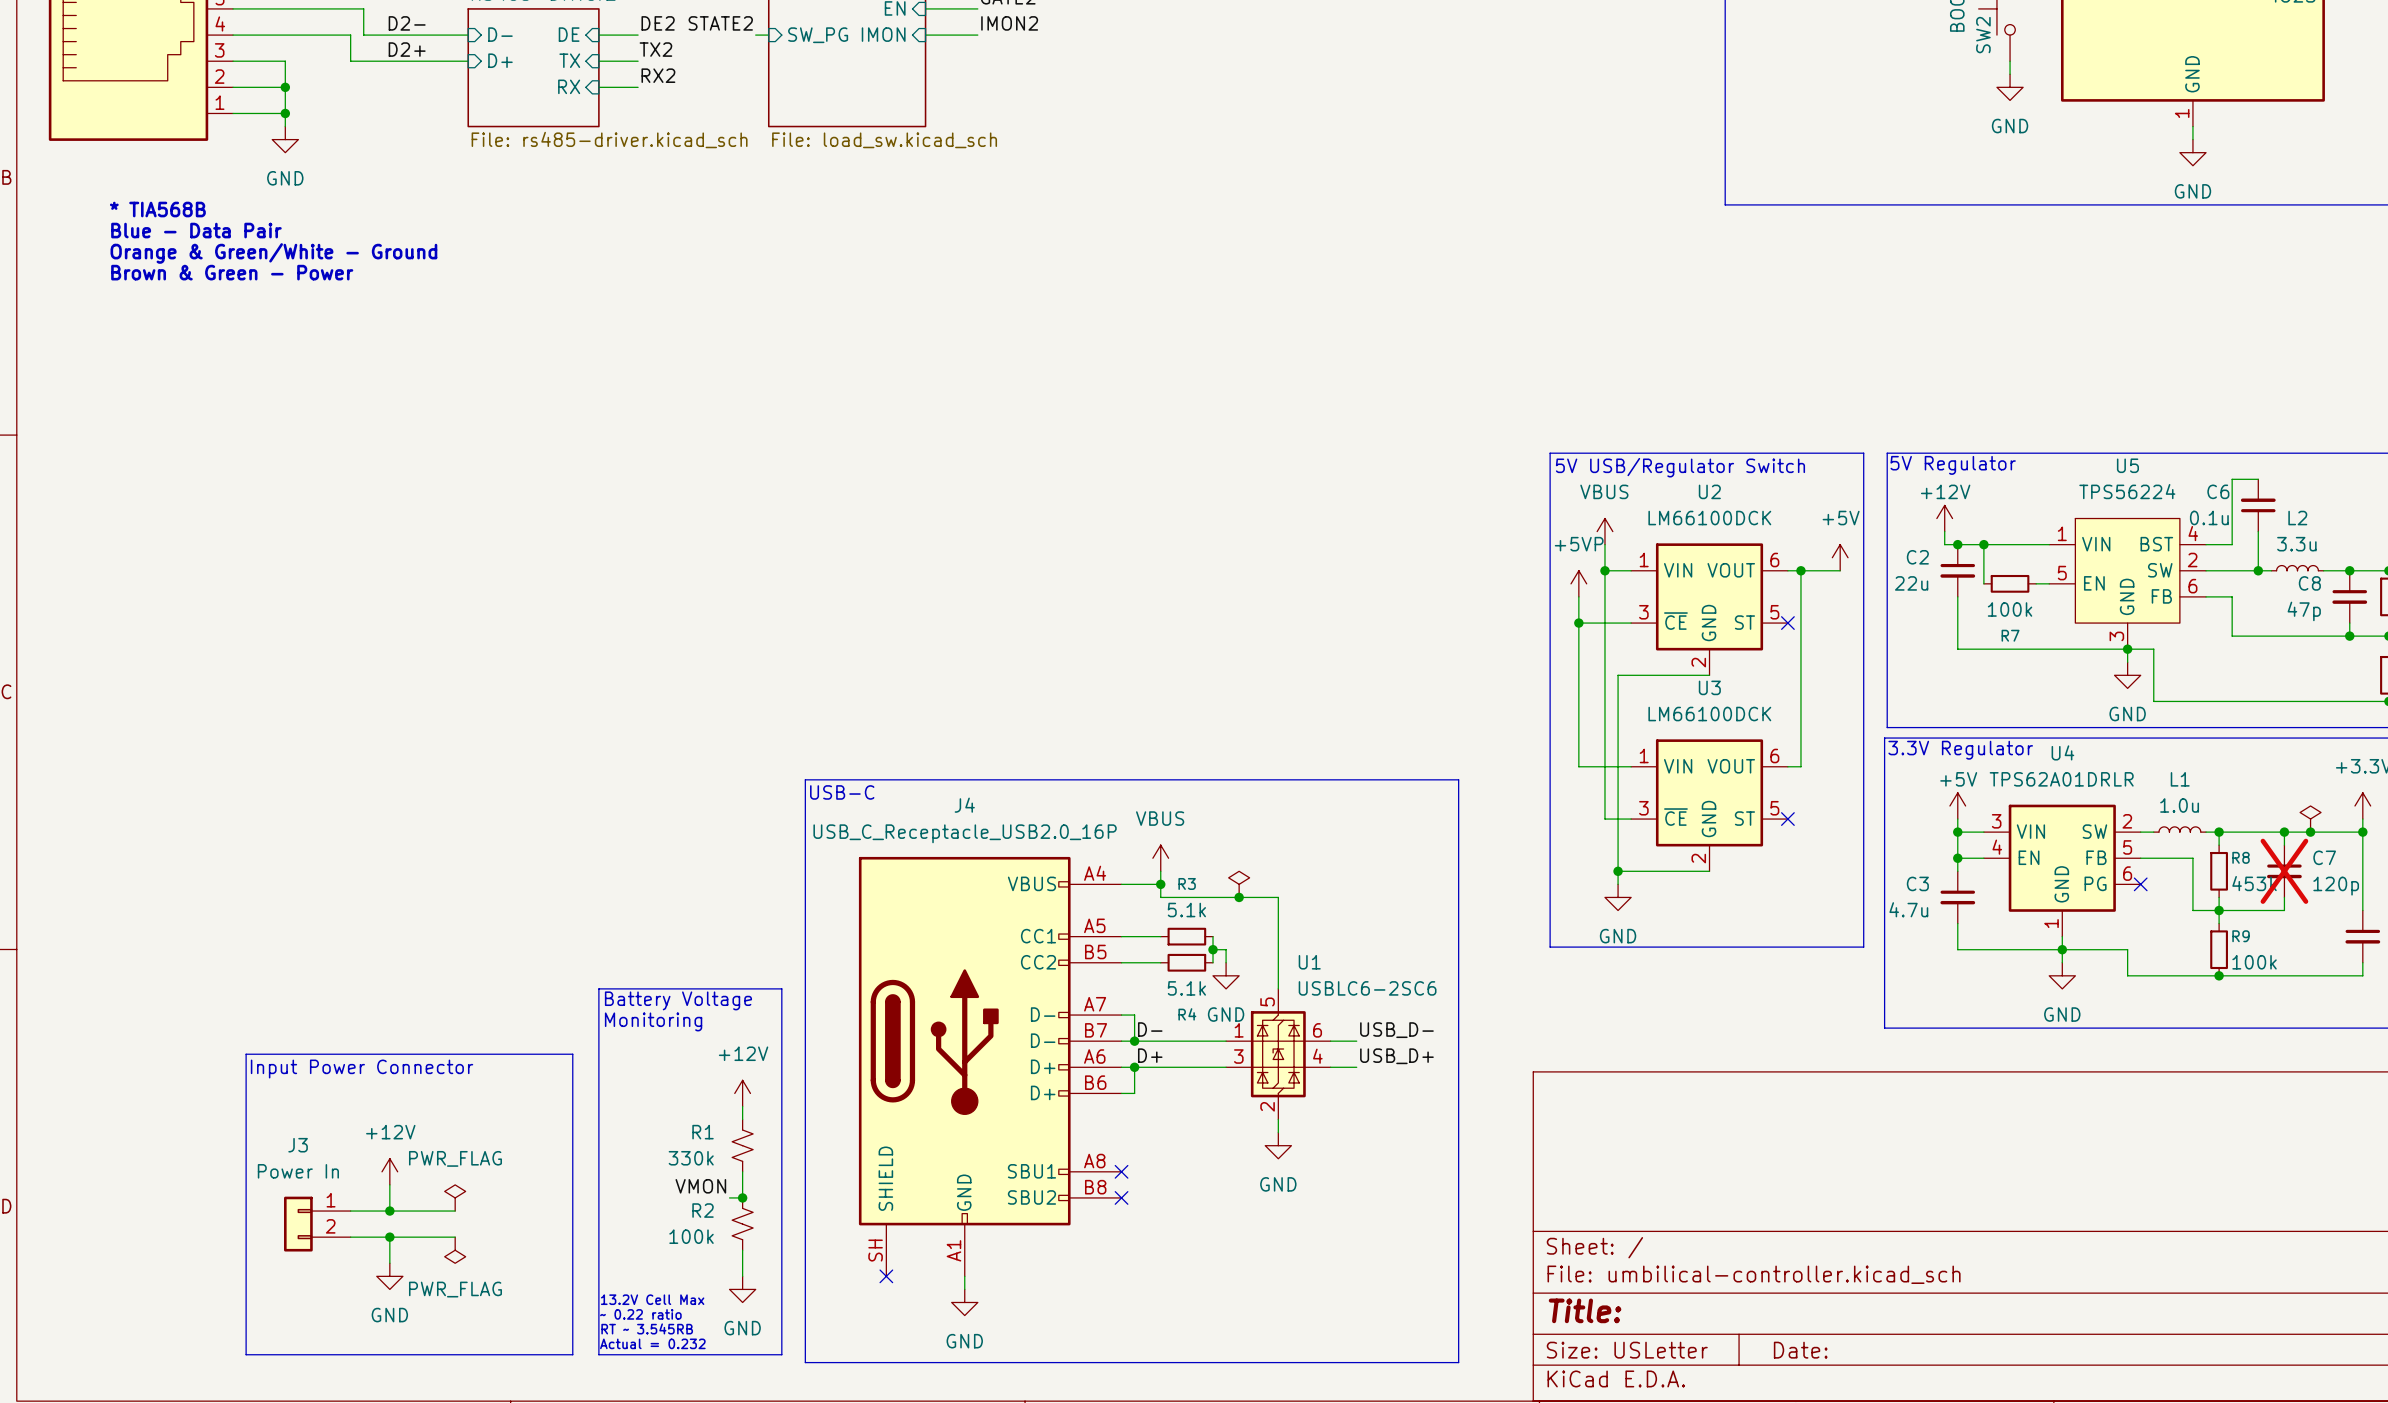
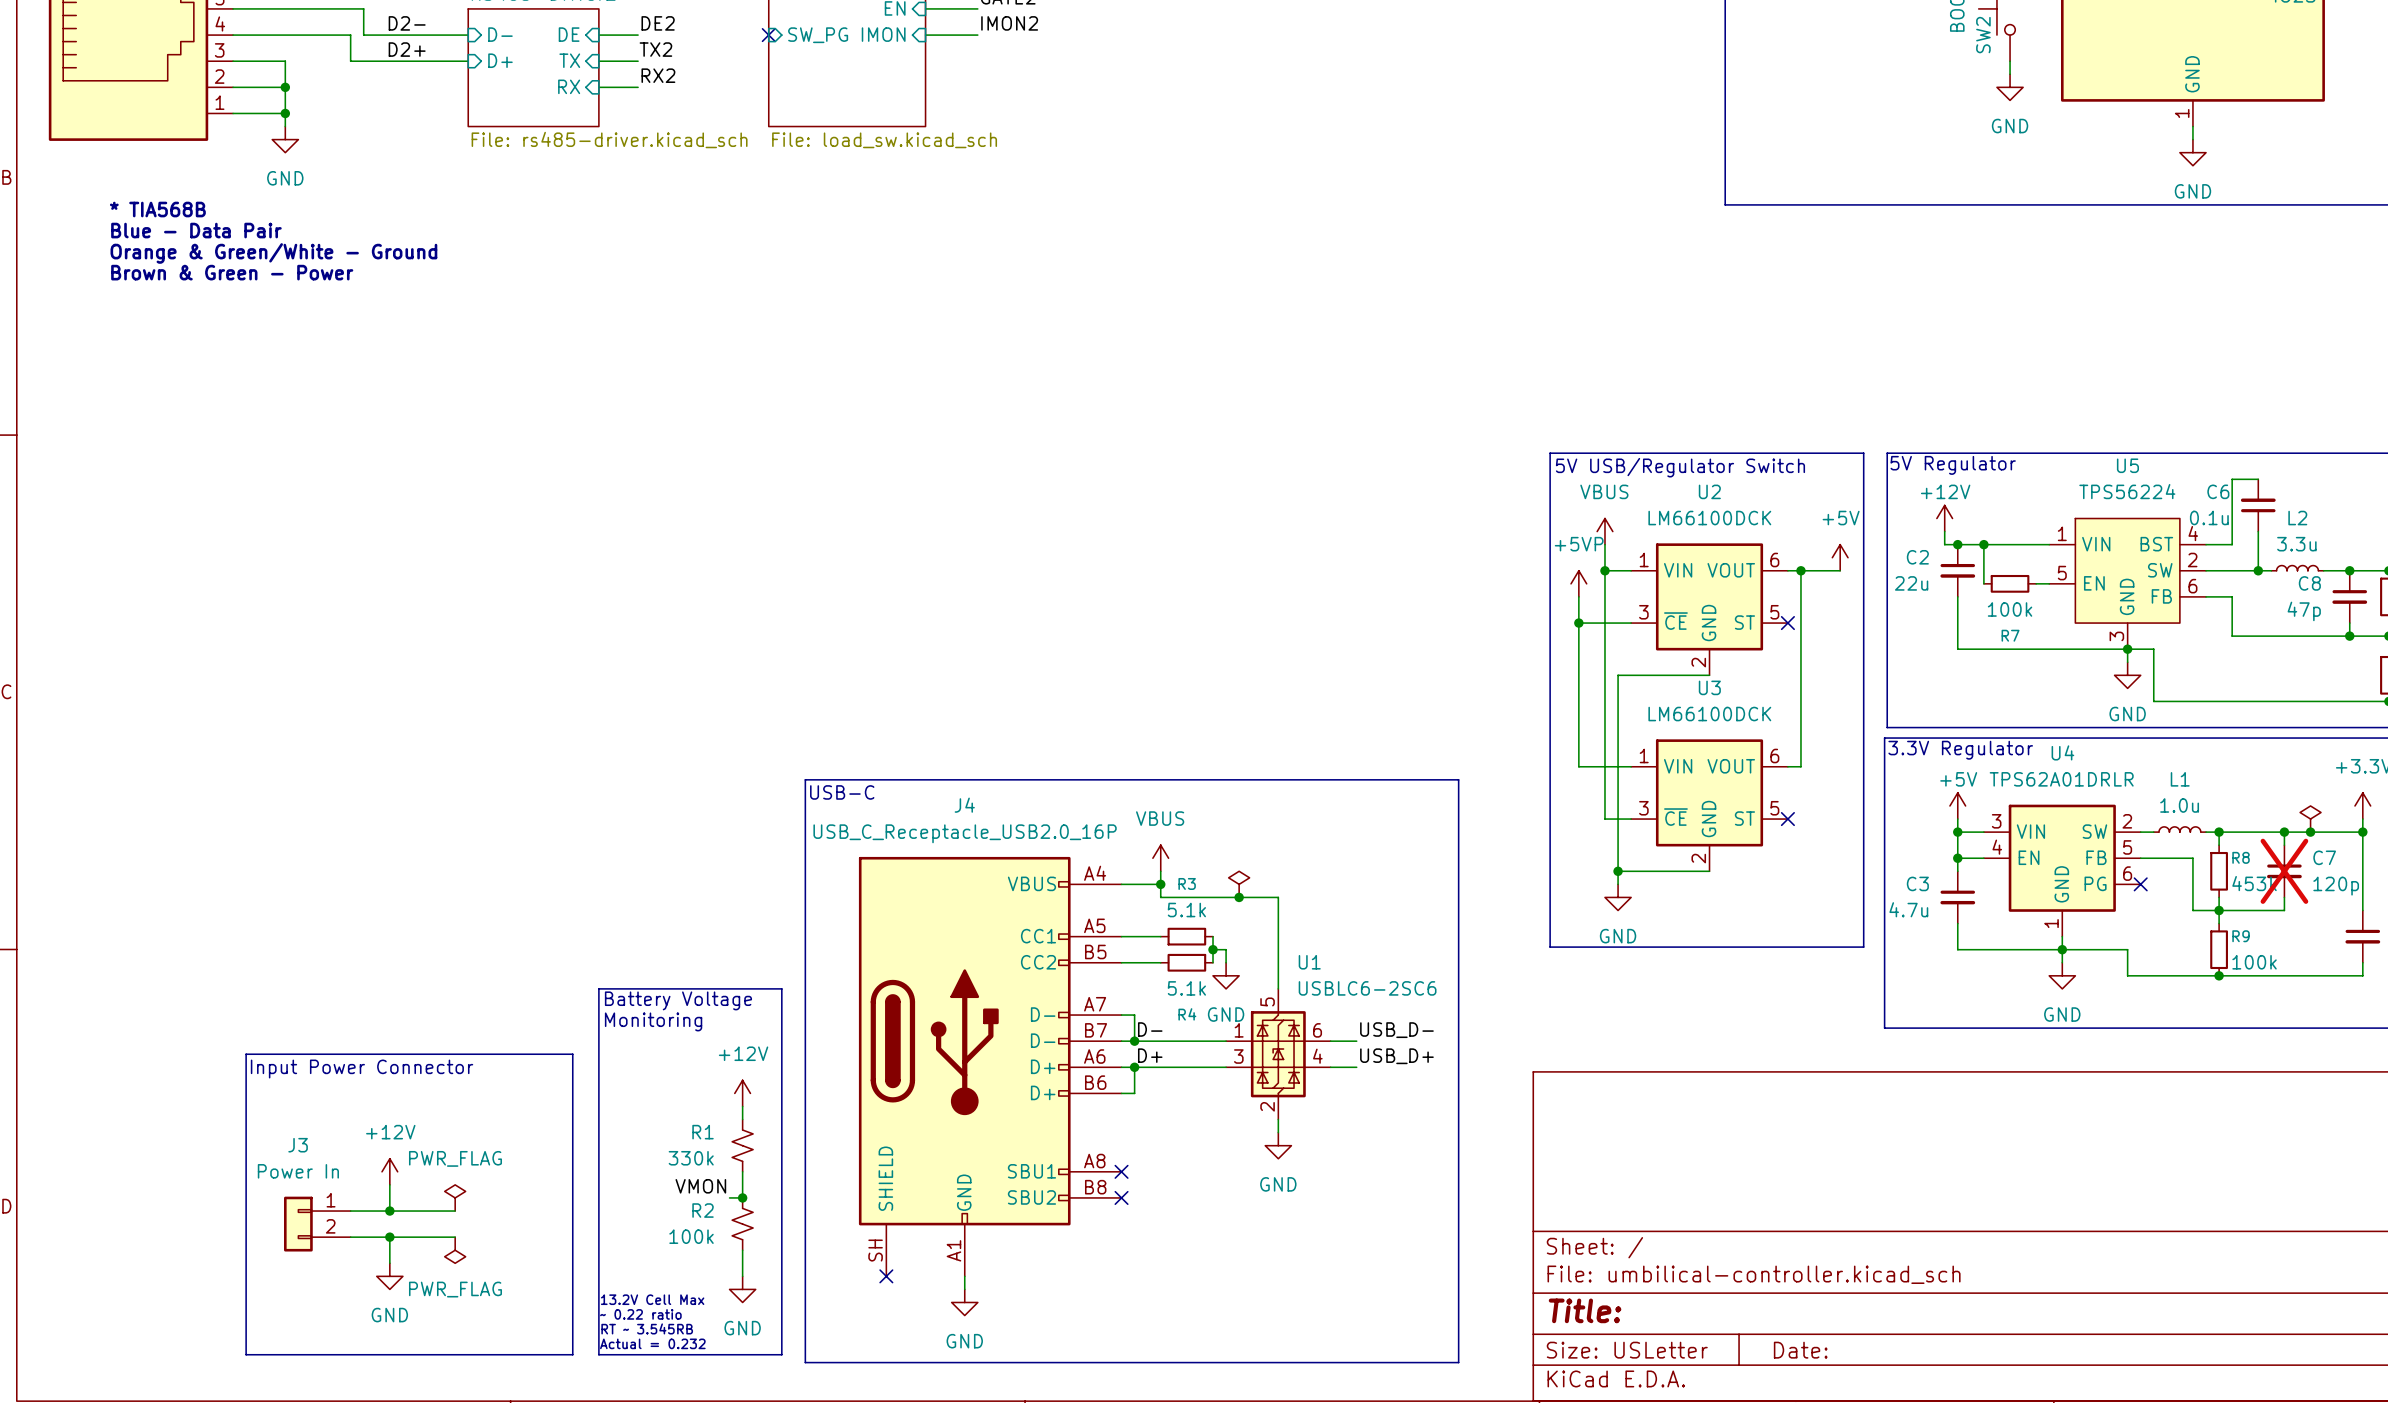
label: STATE2 (720, 23) -> none
wire: (755, 35) (768, 35) -> none
no-connect mark: none -> (768, 35)

